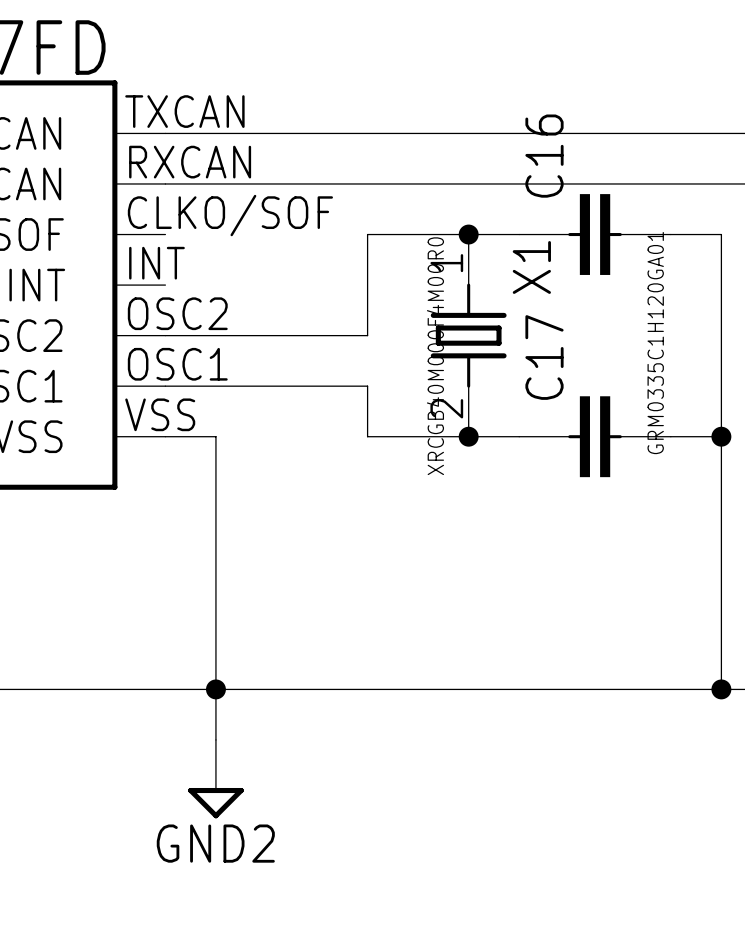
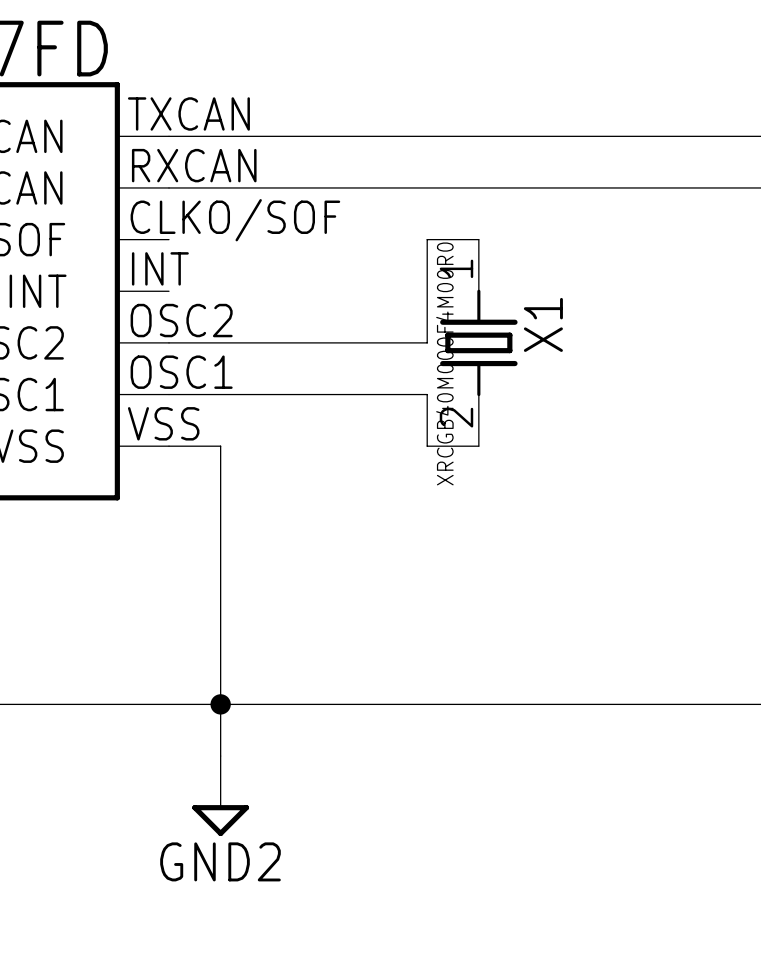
wire: (418, 234) (367, 234) (367, 335) -> (427, 239) (427, 342) (375, 342)
wire: (468, 234) (519, 234) -> none
junction: (468, 234) -> none
C16: GRM0335C1H120GA01 (595, 234) -> none
wire: (670, 234) (721, 234) (721, 689) -> none
X1 name position: X1 (531, 267) -> X1 (543, 324)
wire: (367, 386) (367, 436) (418, 436) -> (375, 394) (427, 394) (427, 446)
wire: (468, 436) (519, 436) -> none
junction: (468, 436) -> none
C17: (595, 436) -> none
wire: (670, 436) (721, 436) -> none
junction: (721, 436) -> none
junction: (721, 689) -> none

